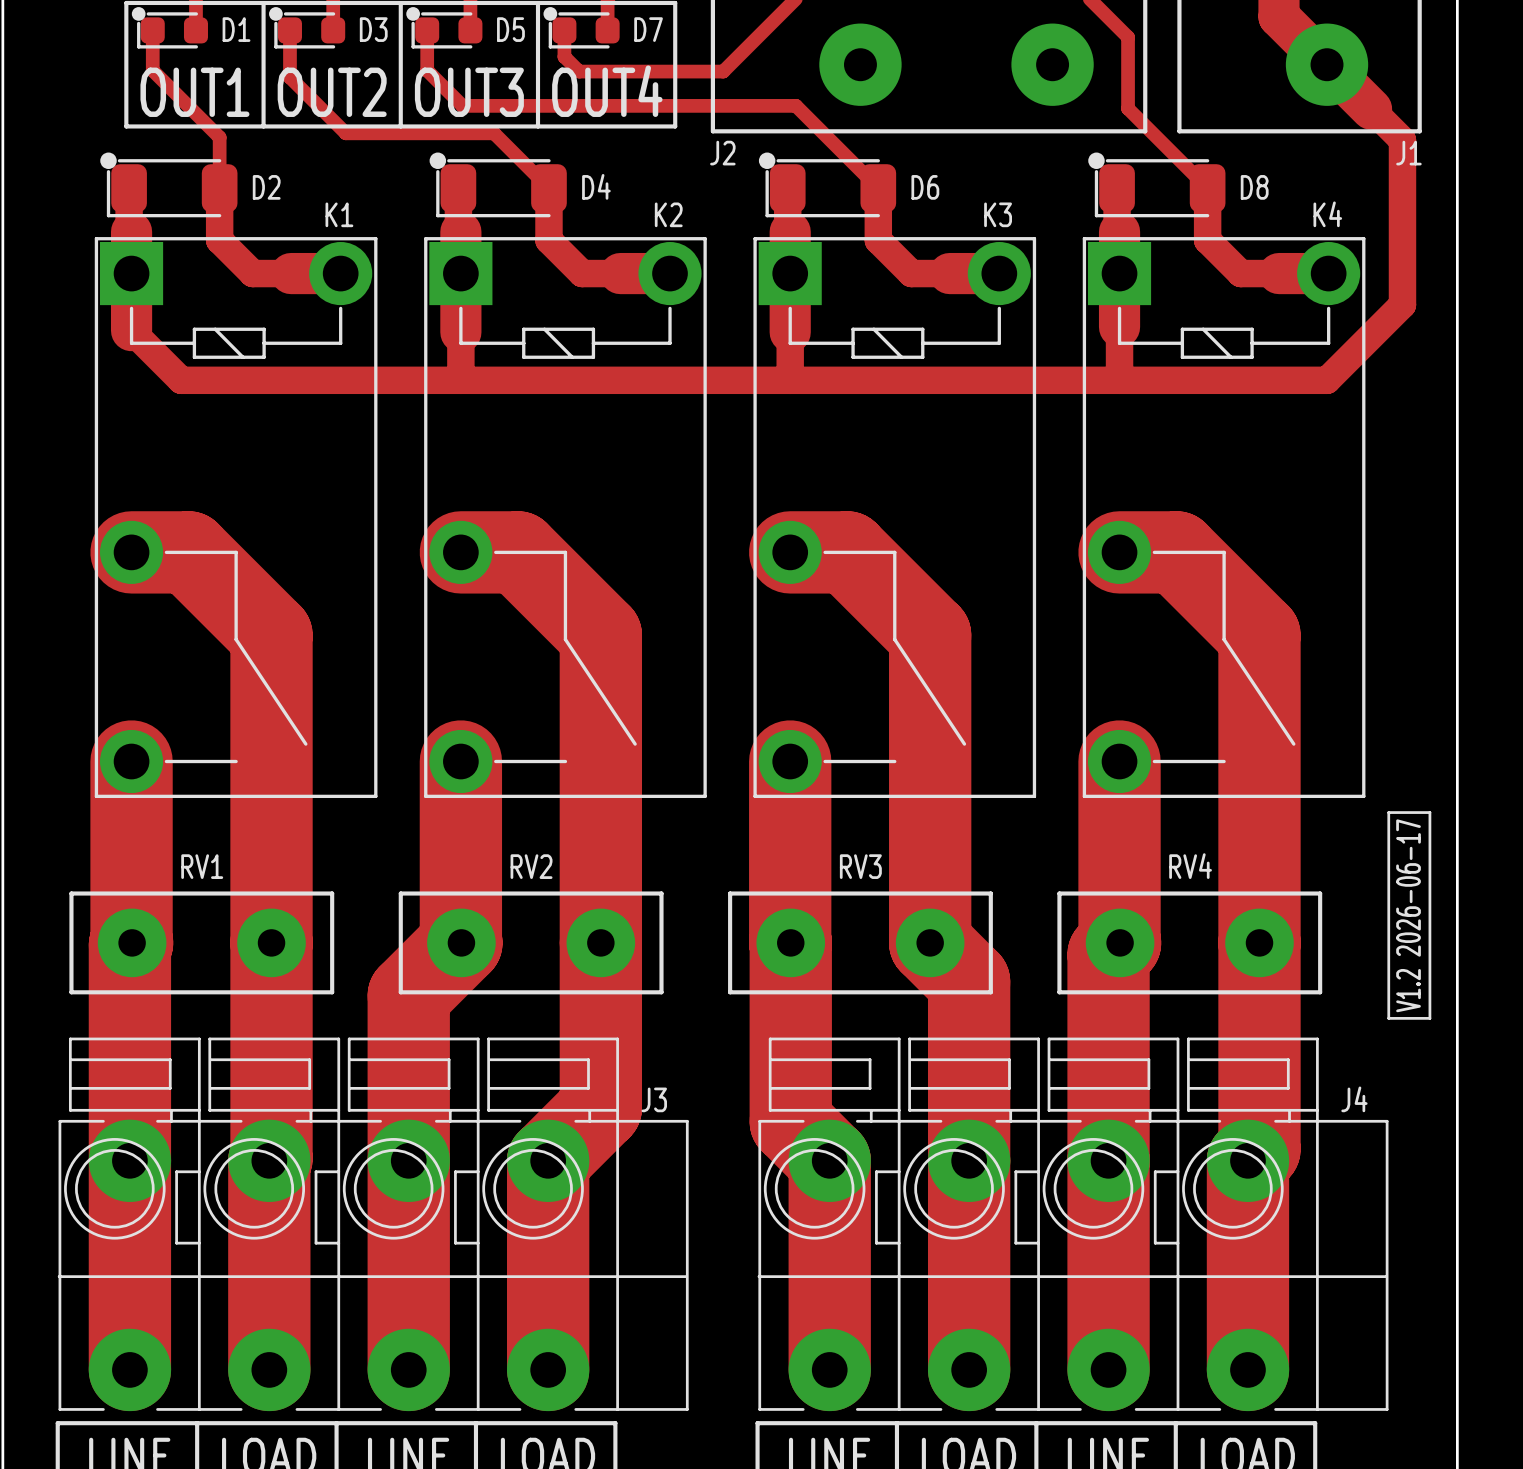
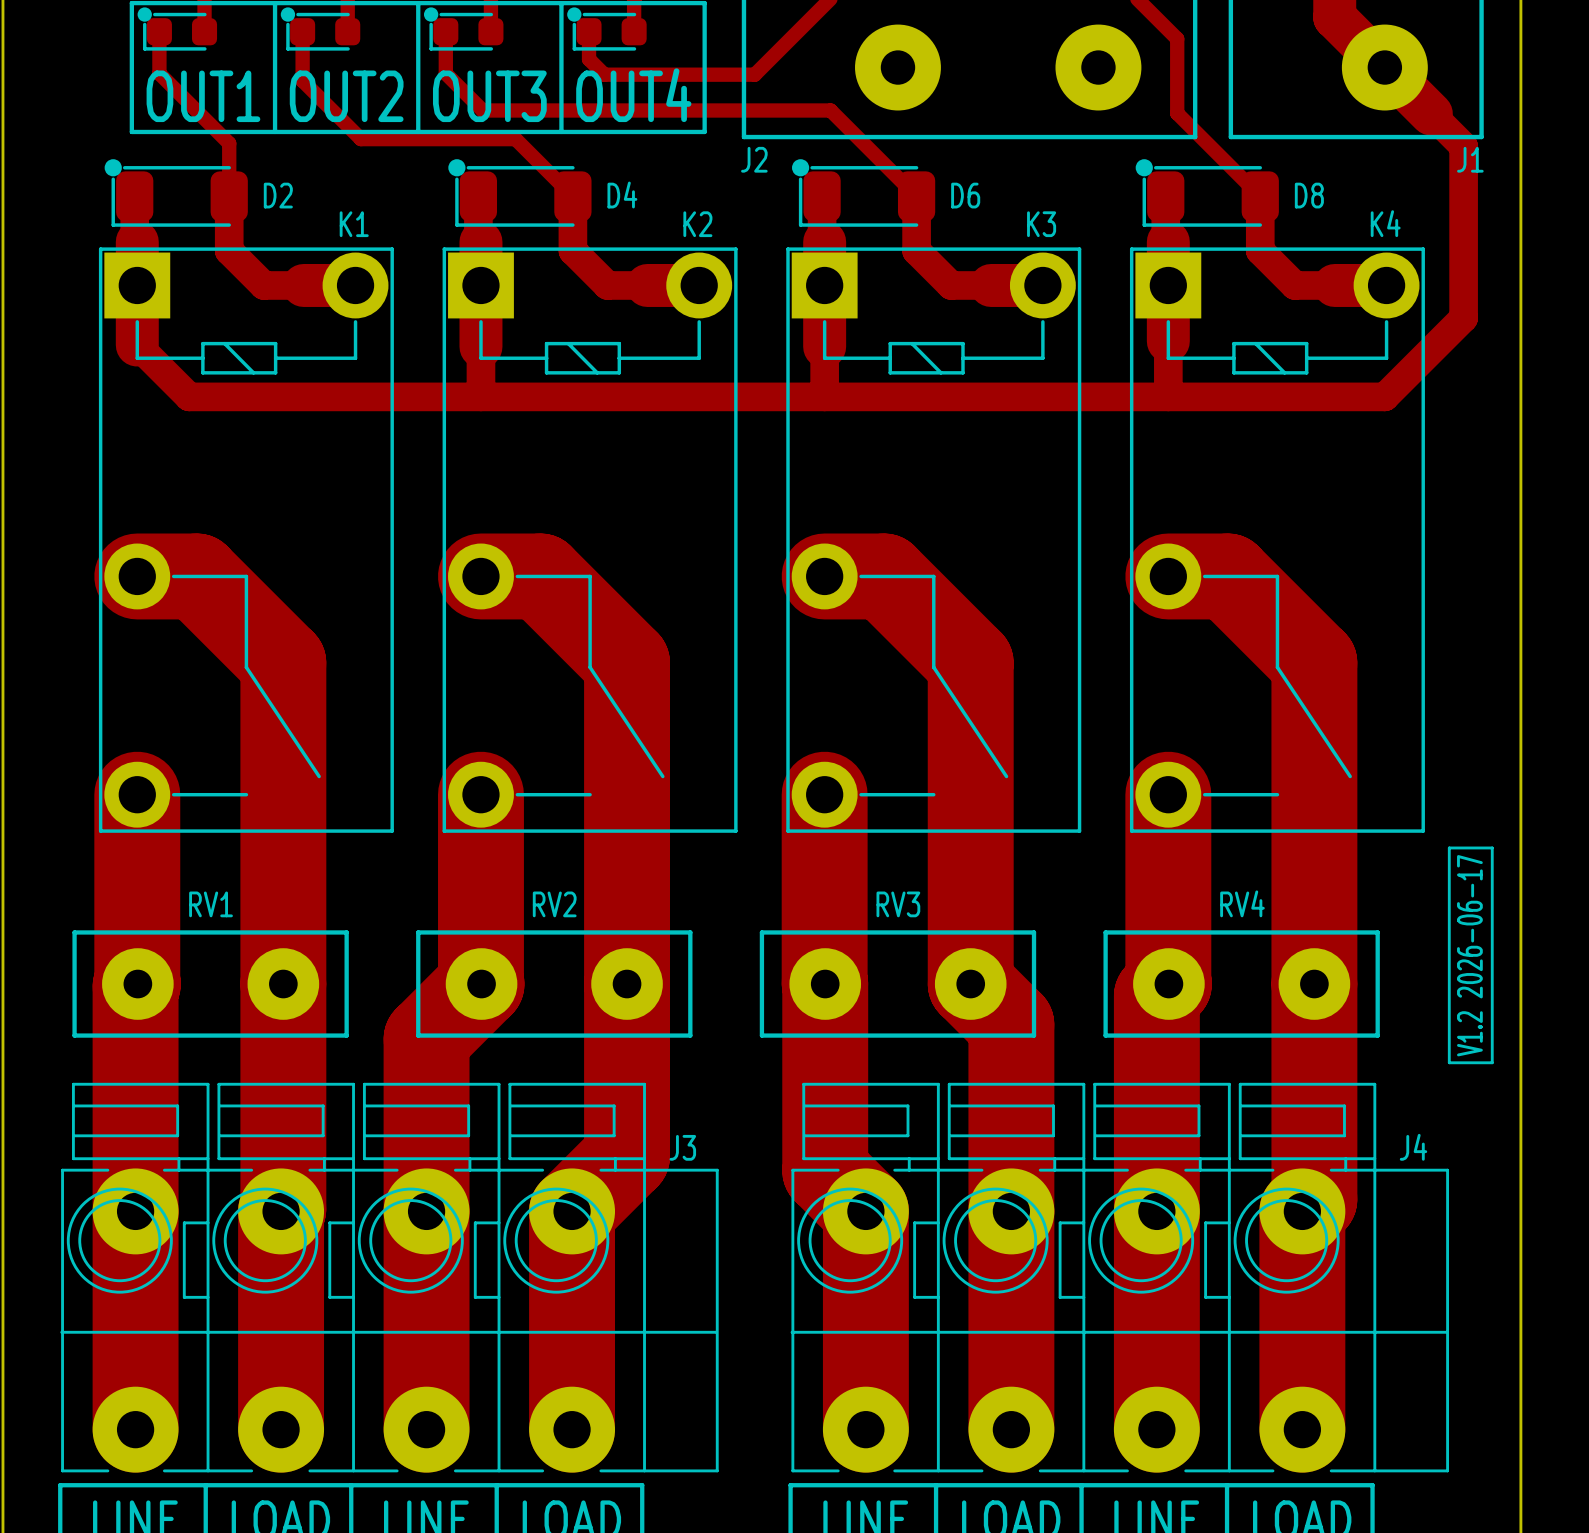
D1 name: D1 (236, 29) -> none
D3 name: D3 (373, 29) -> none
D5 name: D5 (510, 29) -> none
D7 name: D7 (648, 29) -> none

